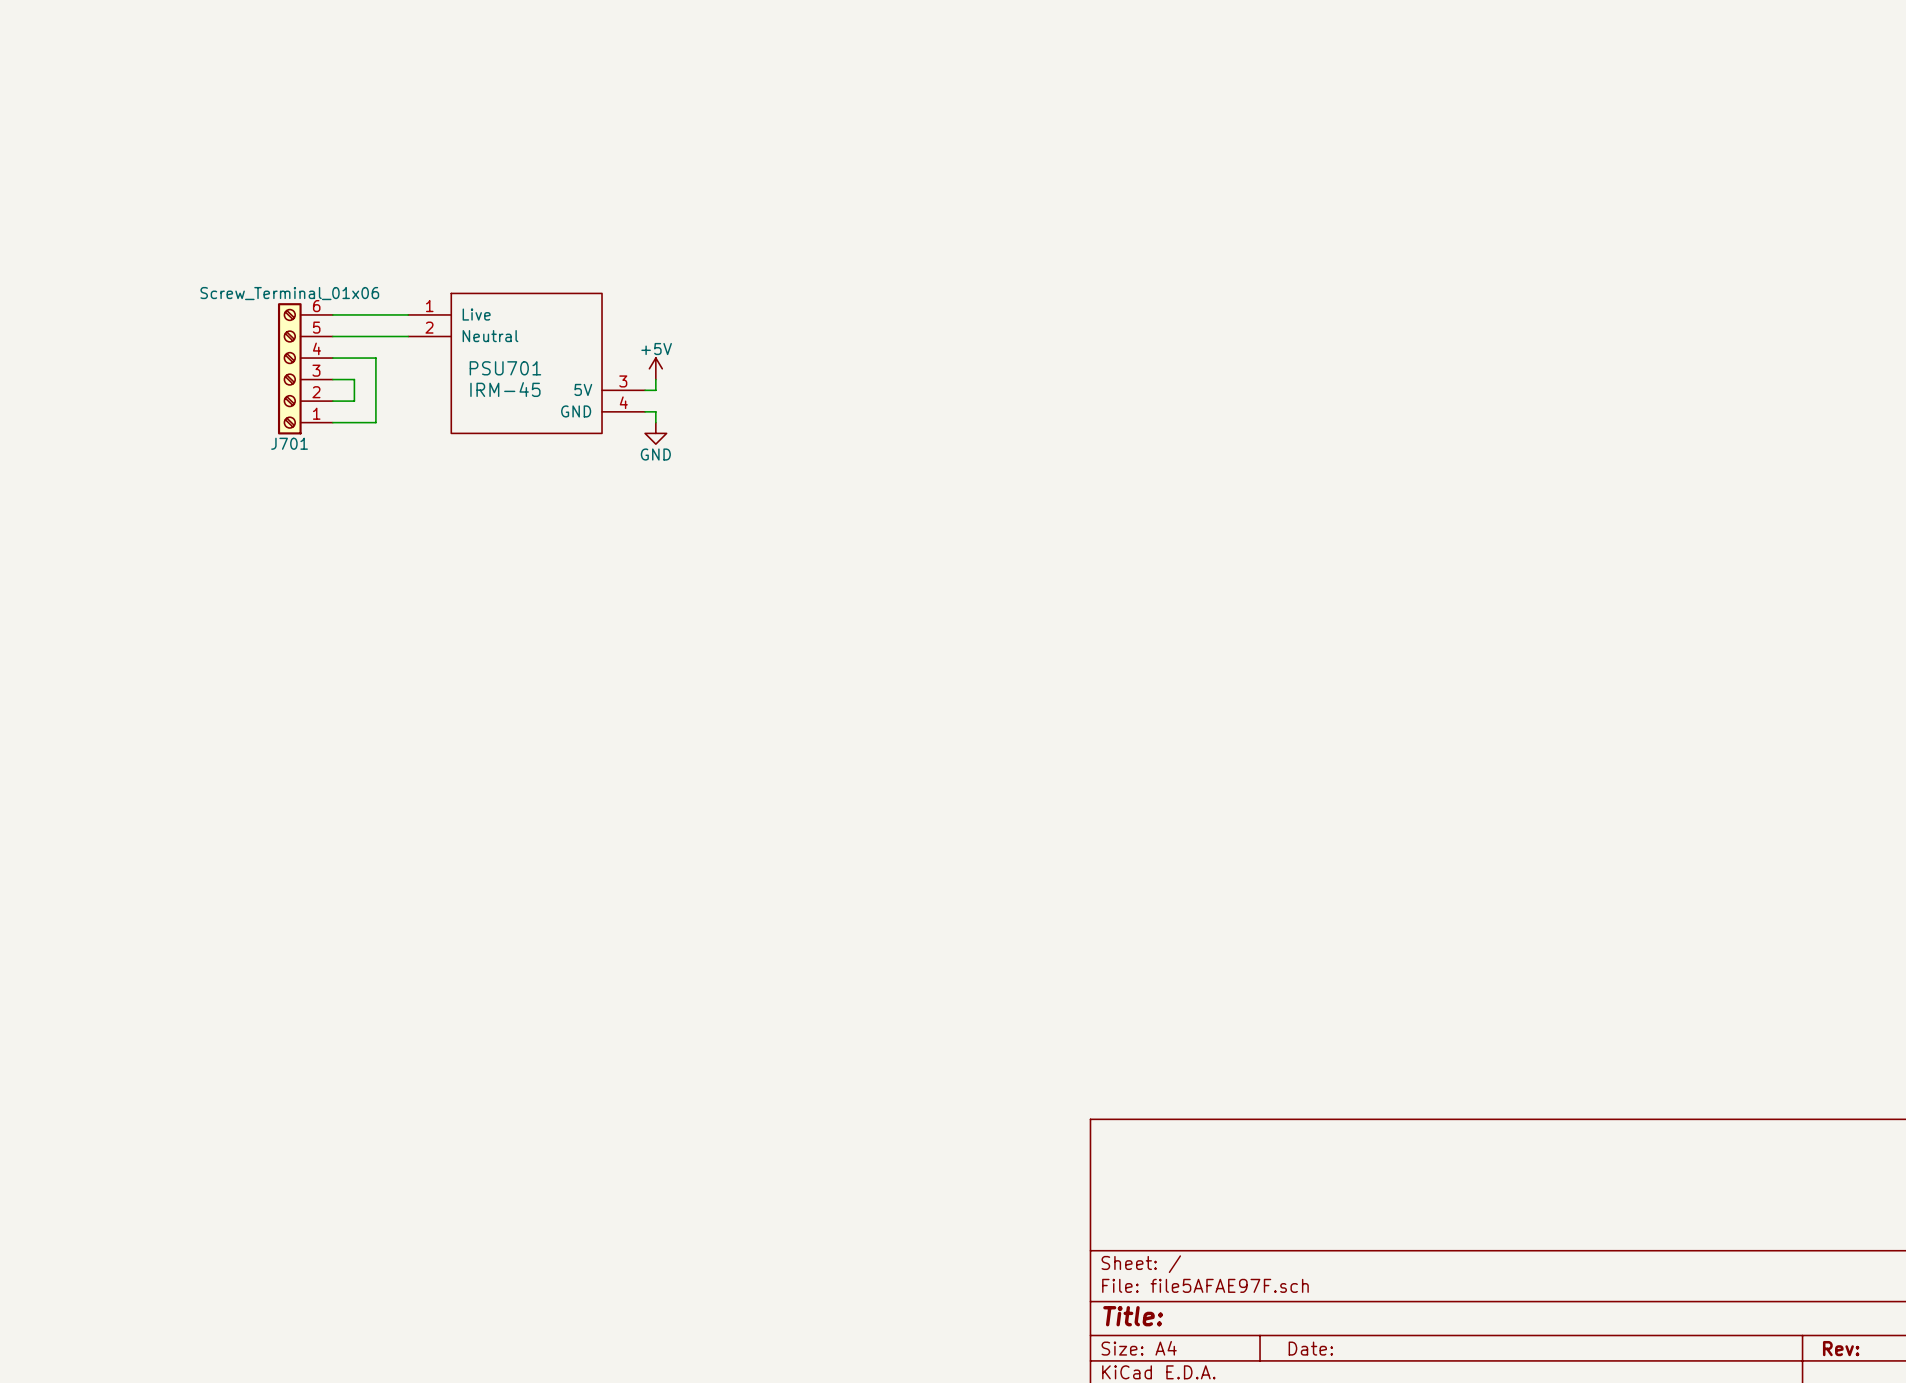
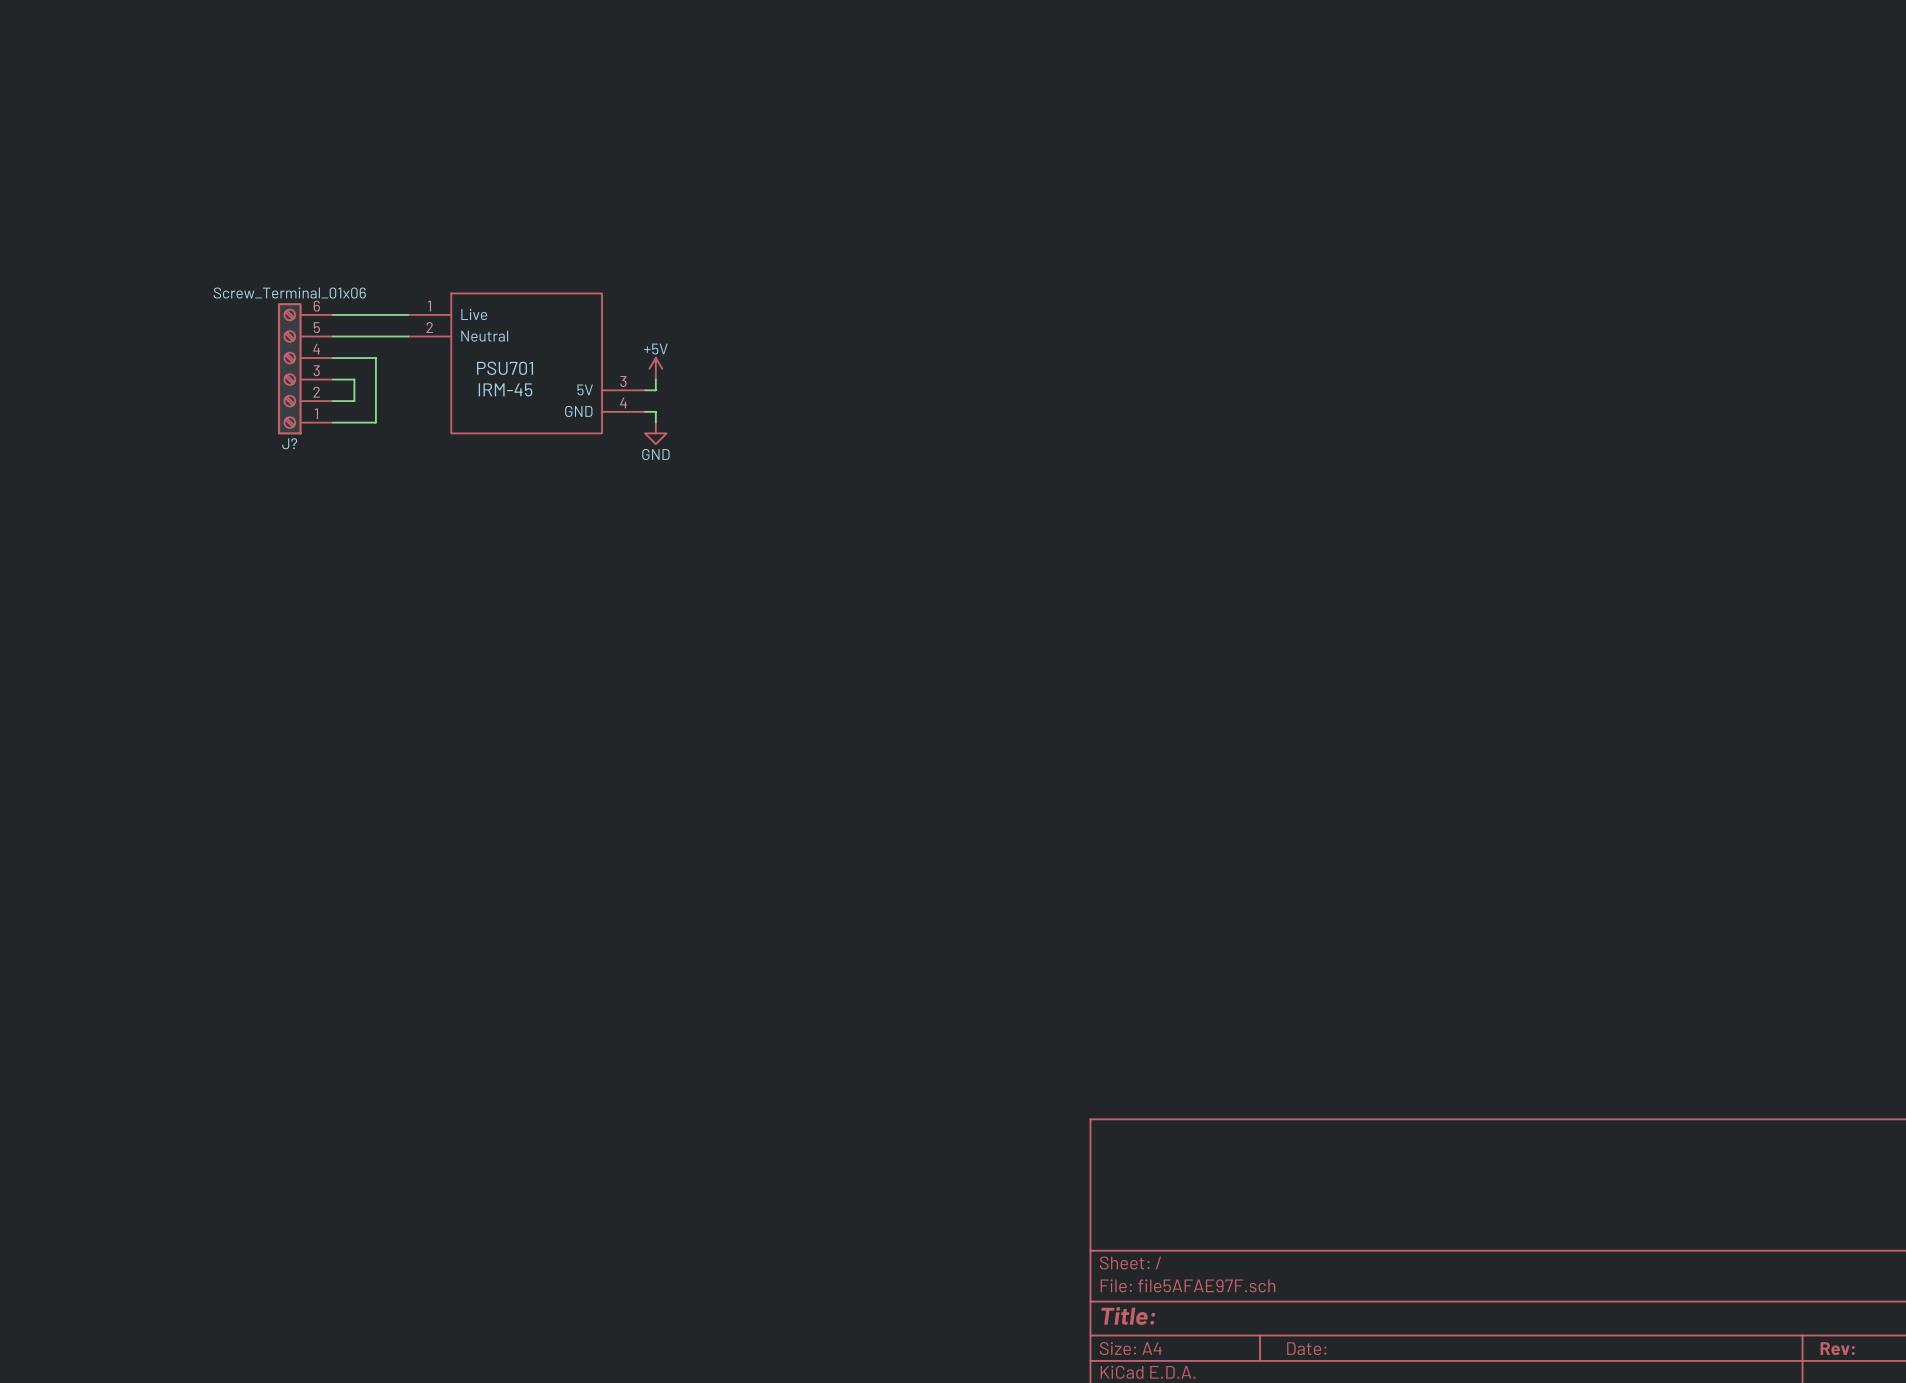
J701 name: J701 (289, 443) -> J? (289, 443)

